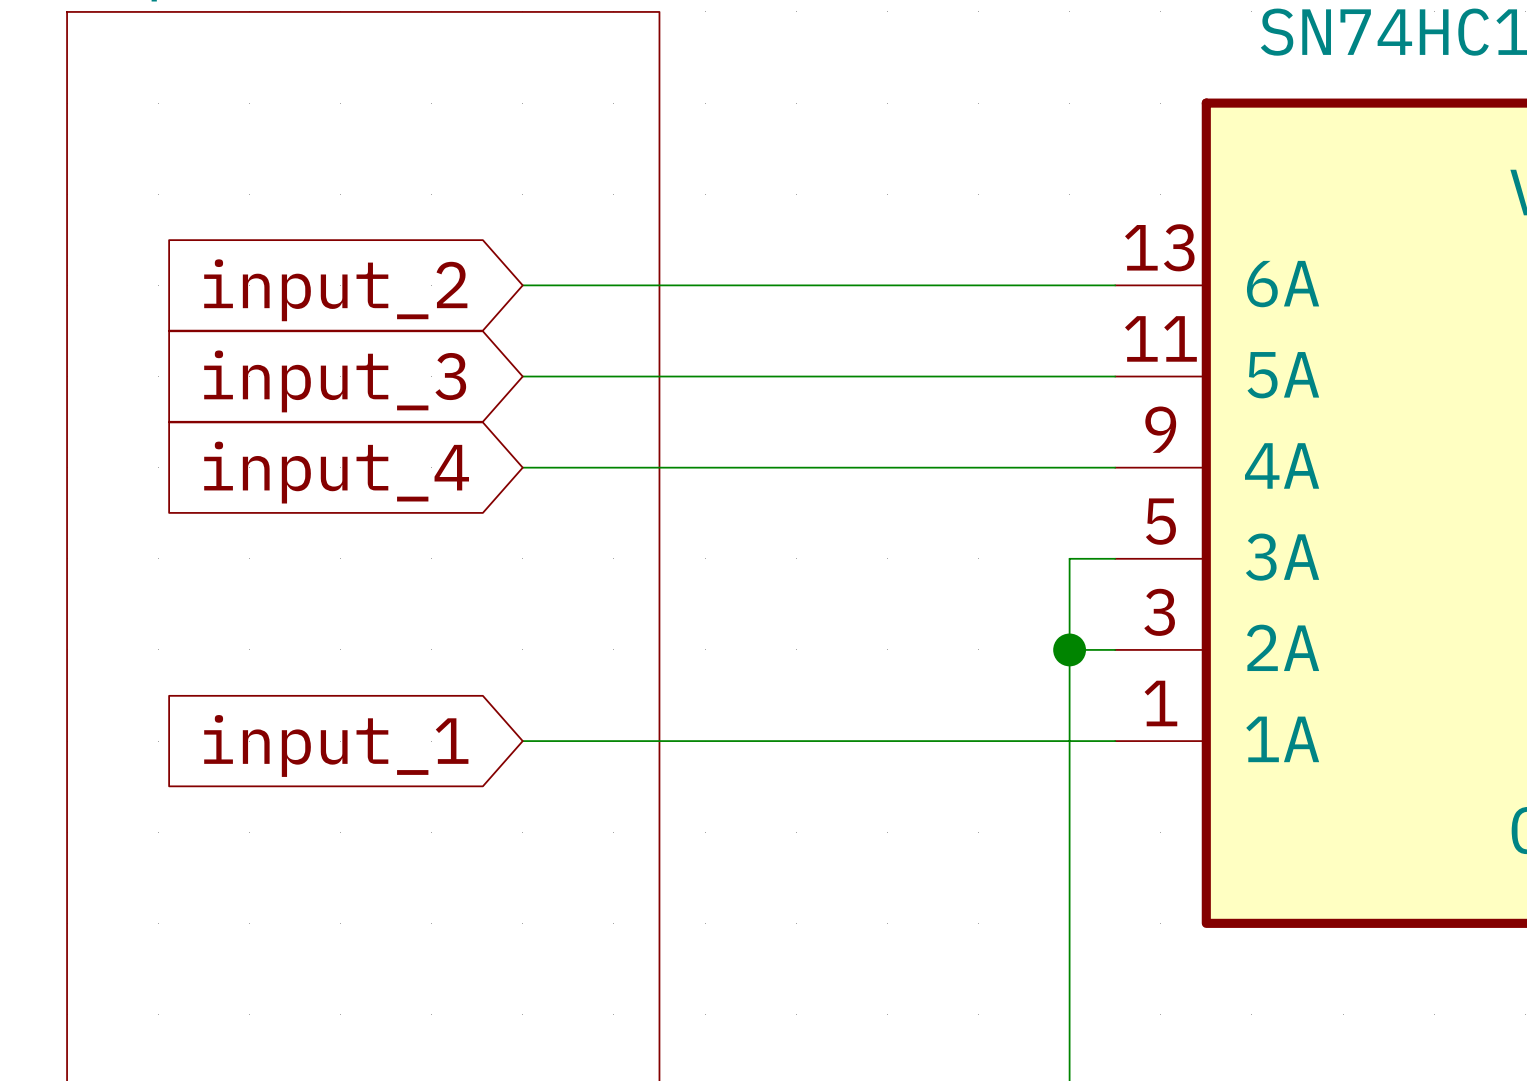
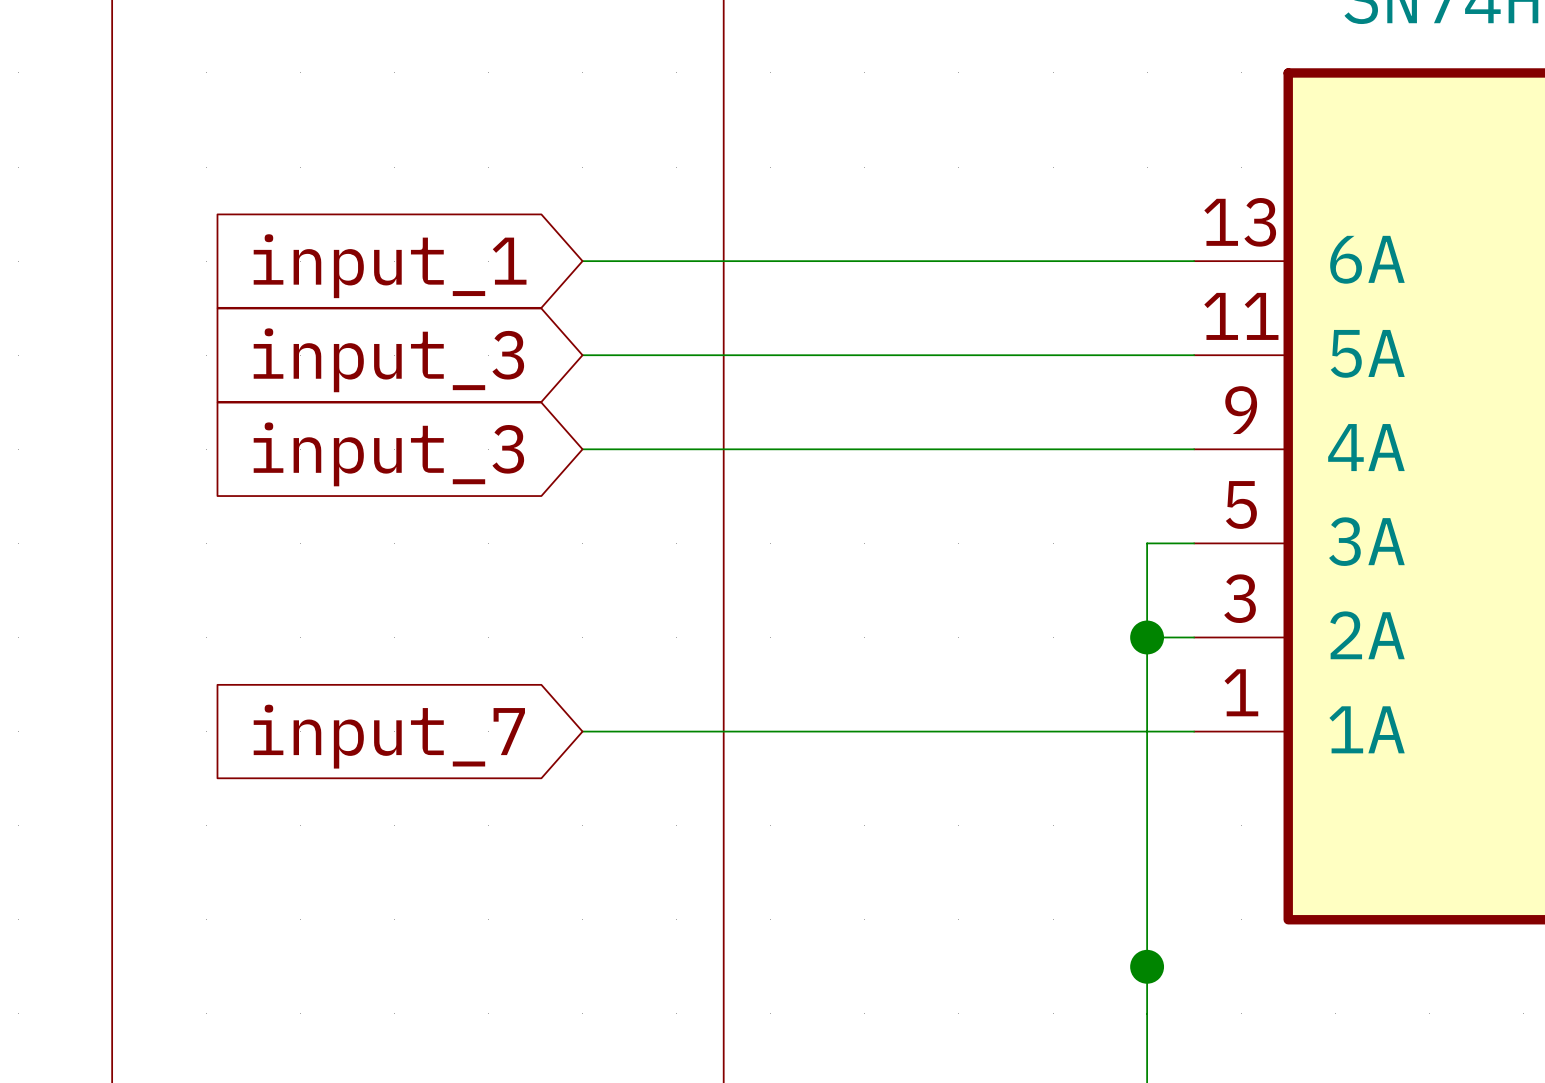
global label: input_2 (335, 290) -> input_1 (390, 266)
global label: input_4 (336, 472) -> input_3 (388, 454)
global label: input_1 (336, 745) -> input_7 (389, 736)
junction: none -> (1147, 966)

